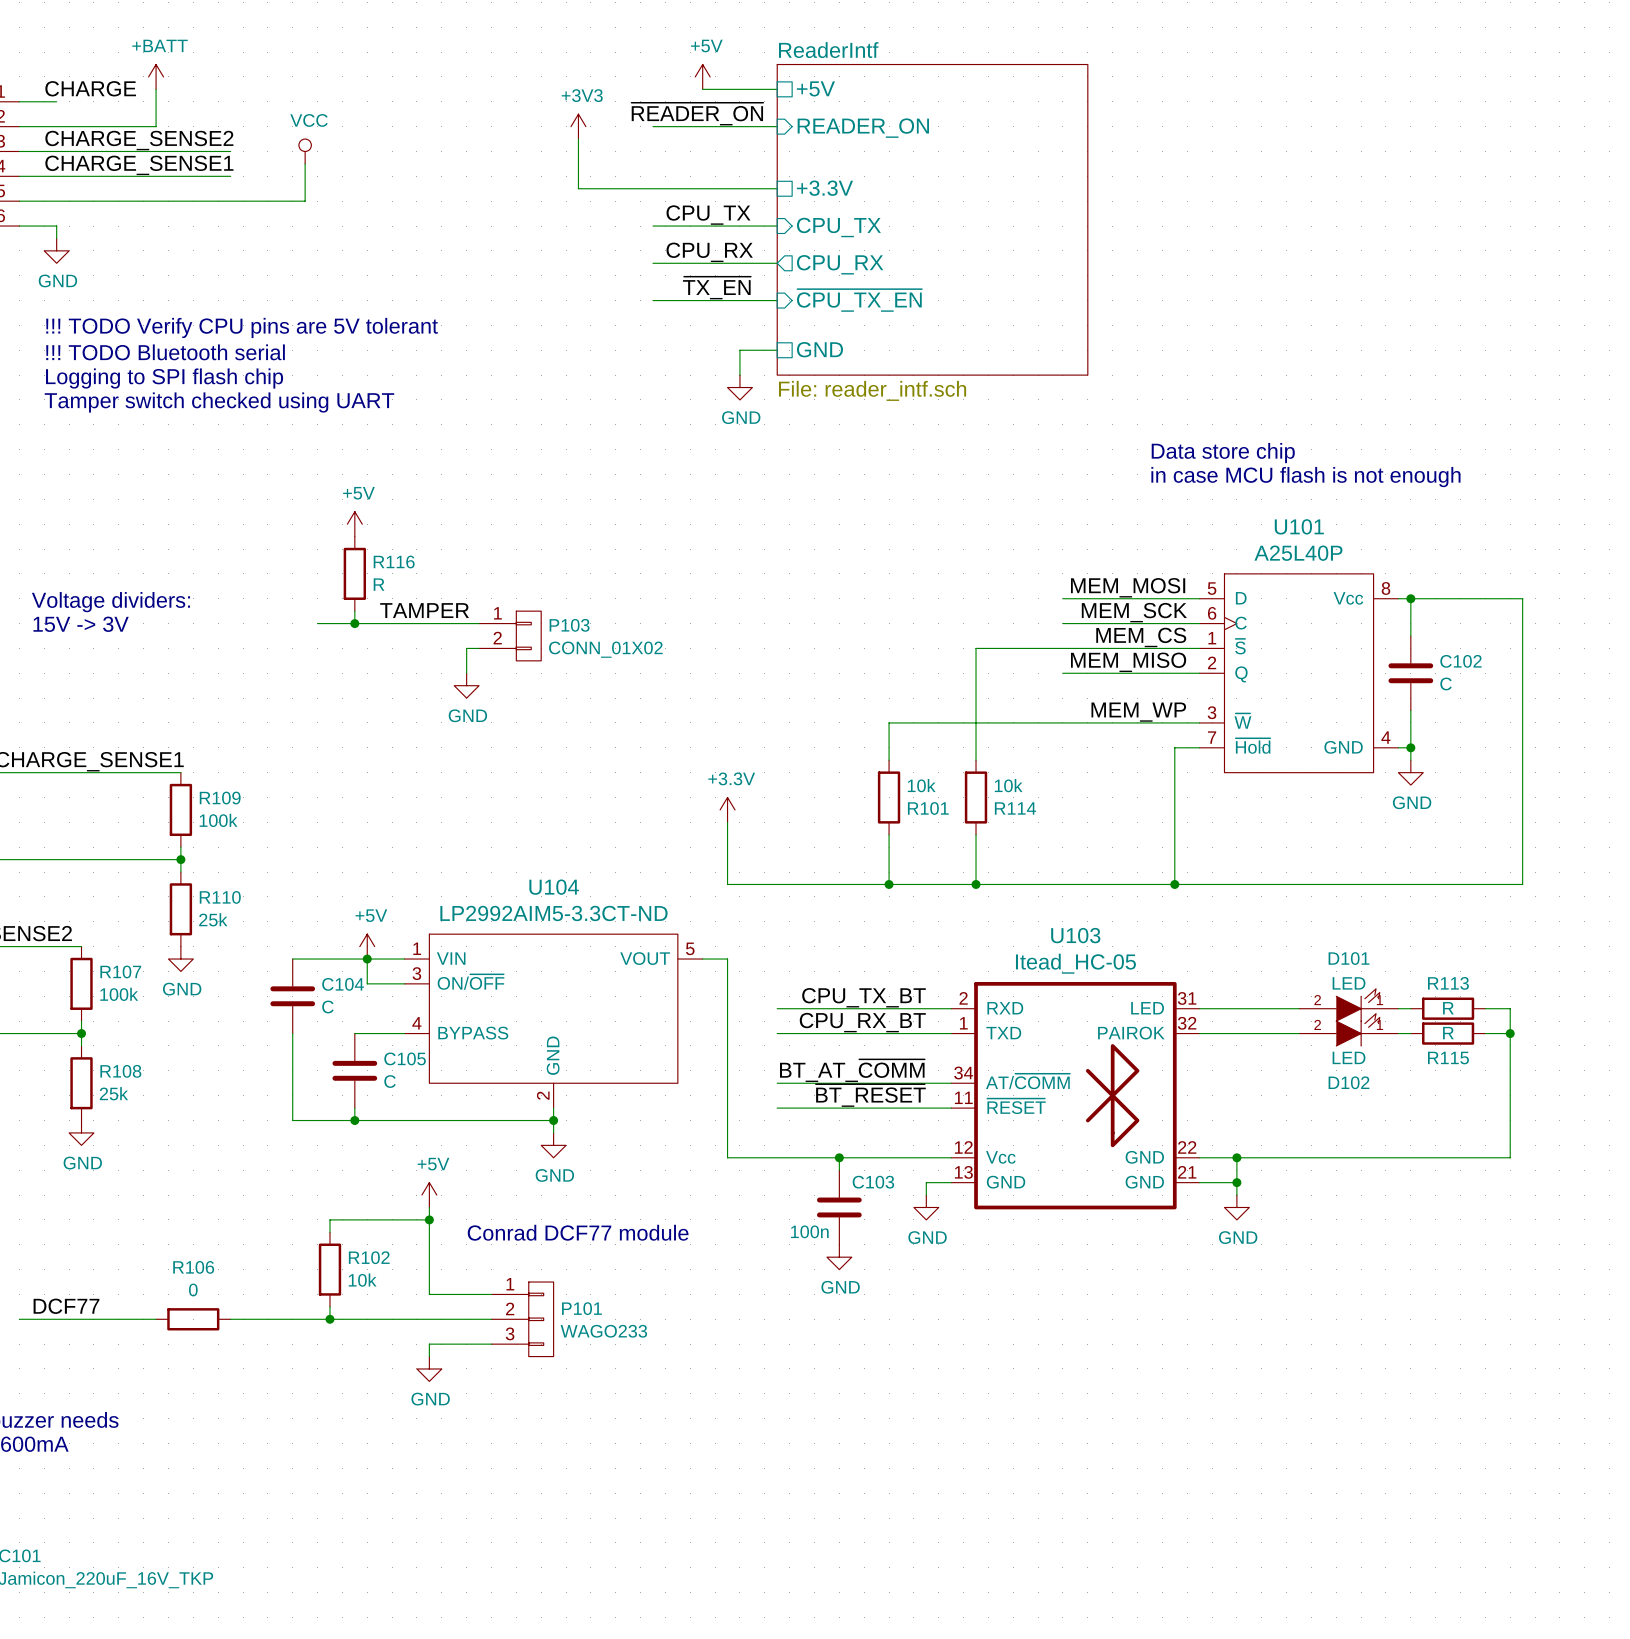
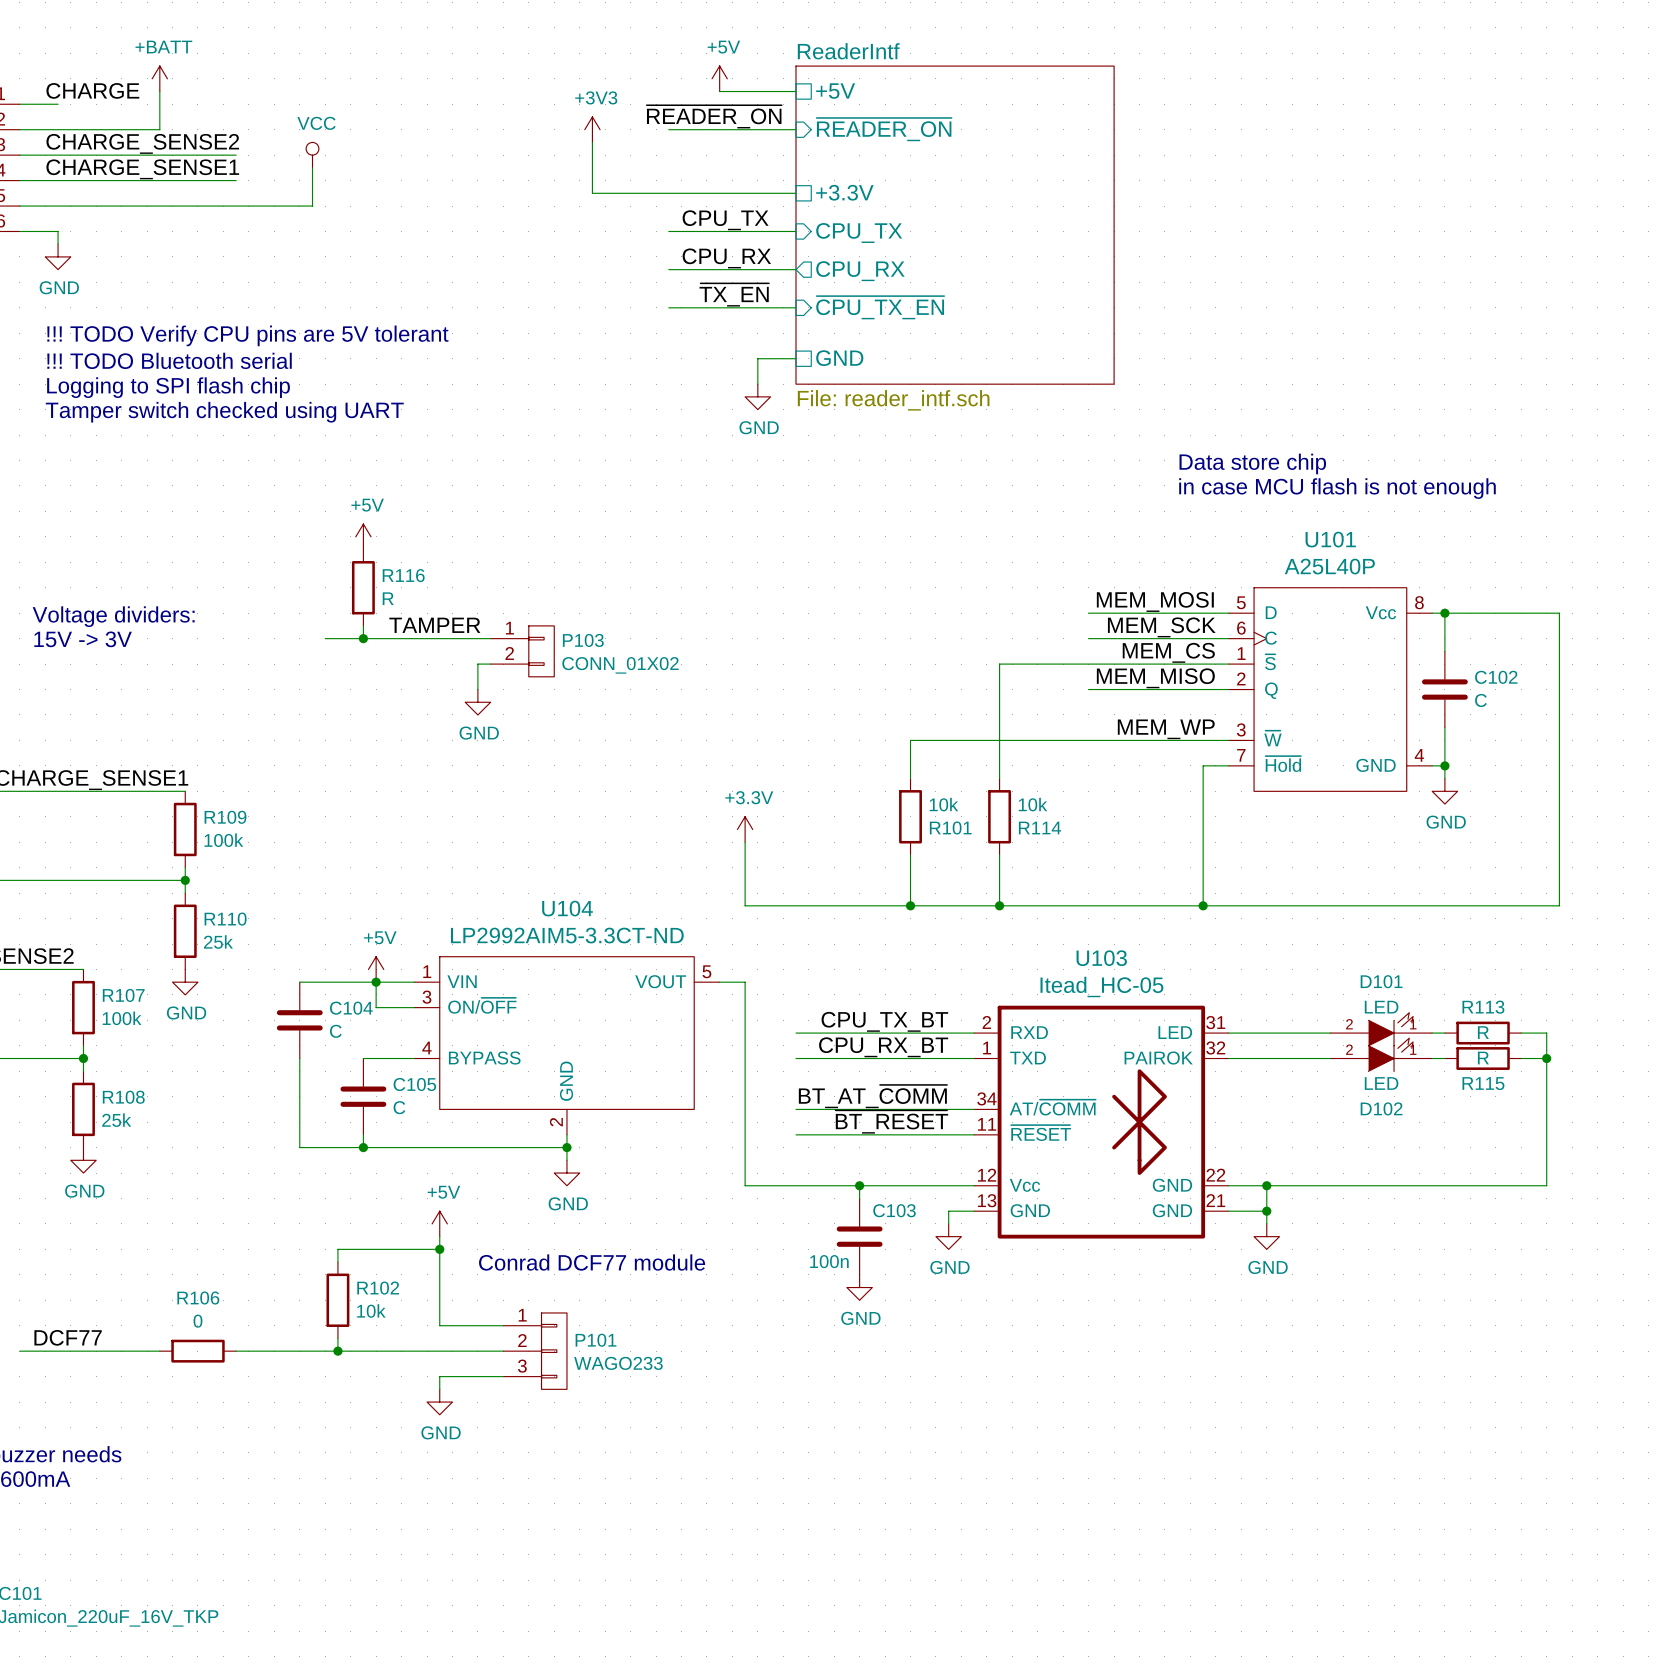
sheet pin: READER_ON (863, 128) -> ~{READER_ON} (884, 129)

